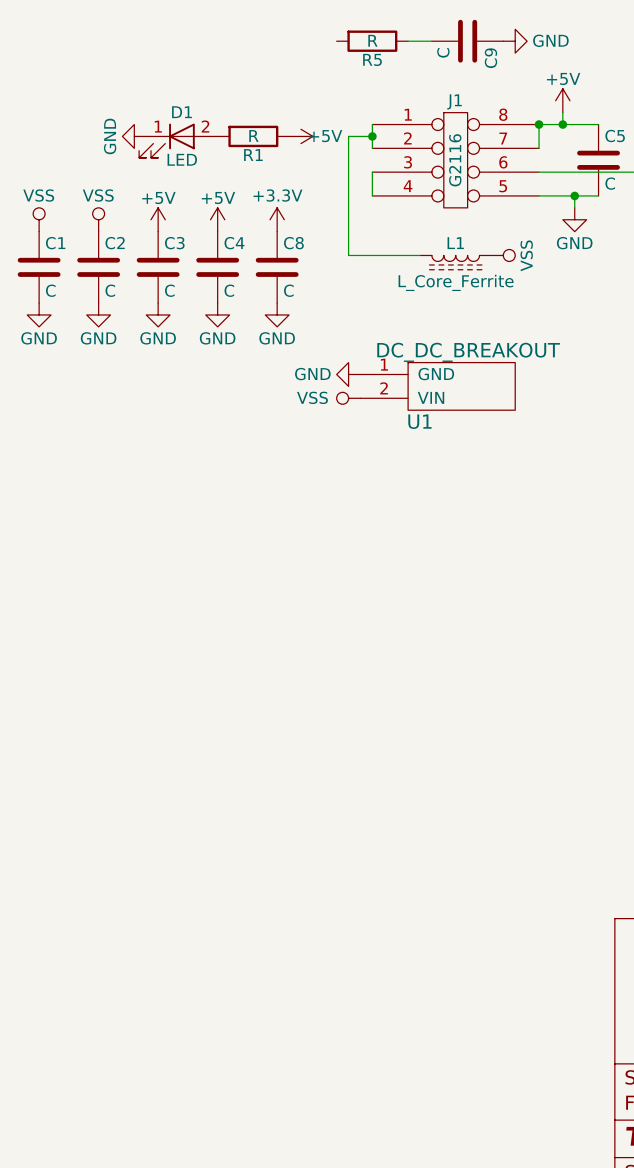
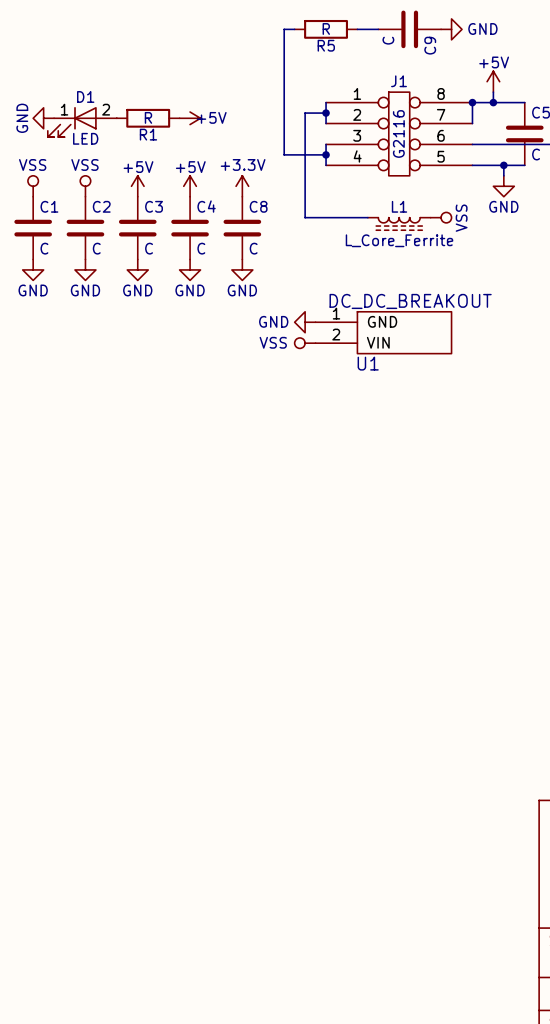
wire: none -> (294, 29) (284, 29) (284, 154) (326, 154)
power symbol position: GND (134, 136) -> GND (43, 118)
R1 position: (253, 136) -> (148, 118)
power symbol position: +5V (300, 136) -> +5V (190, 118)
D1 position: (178, 140) -> (82, 122)
junction: none -> (326, 154)

